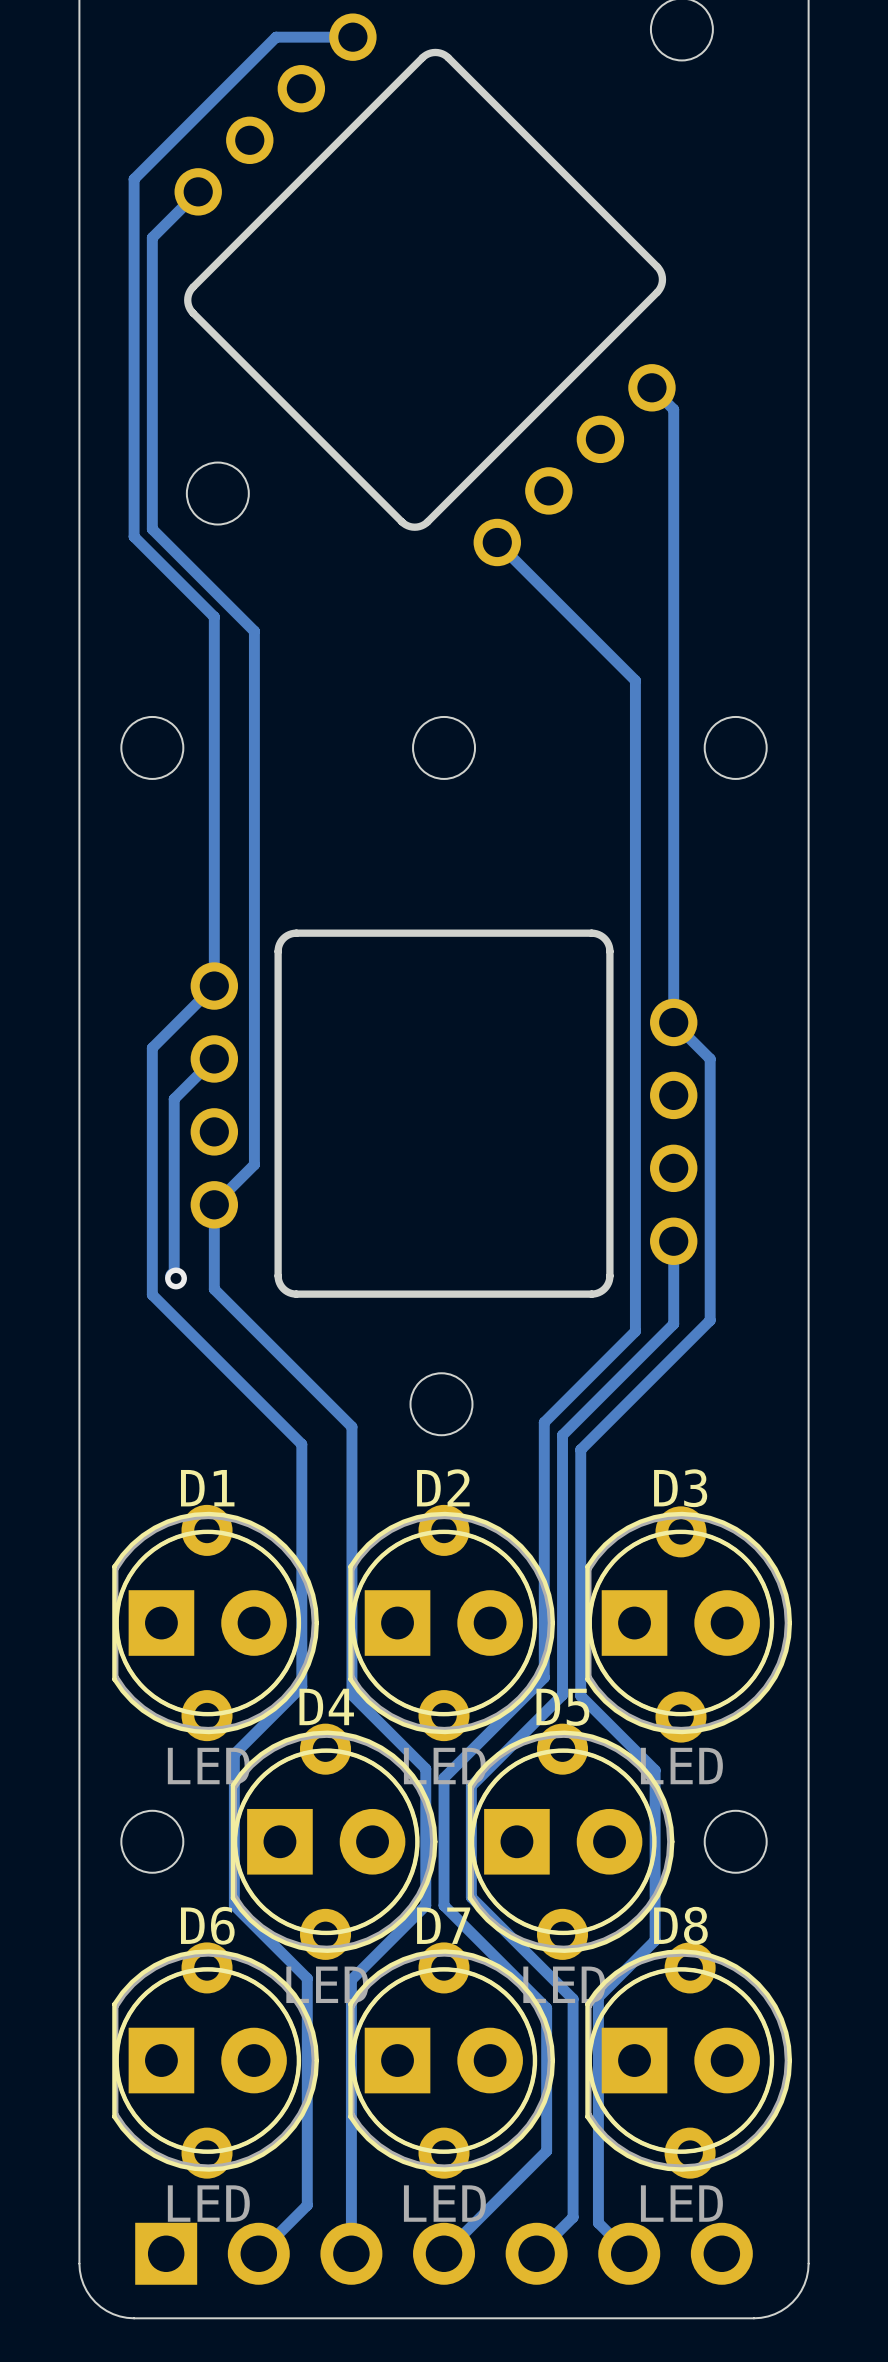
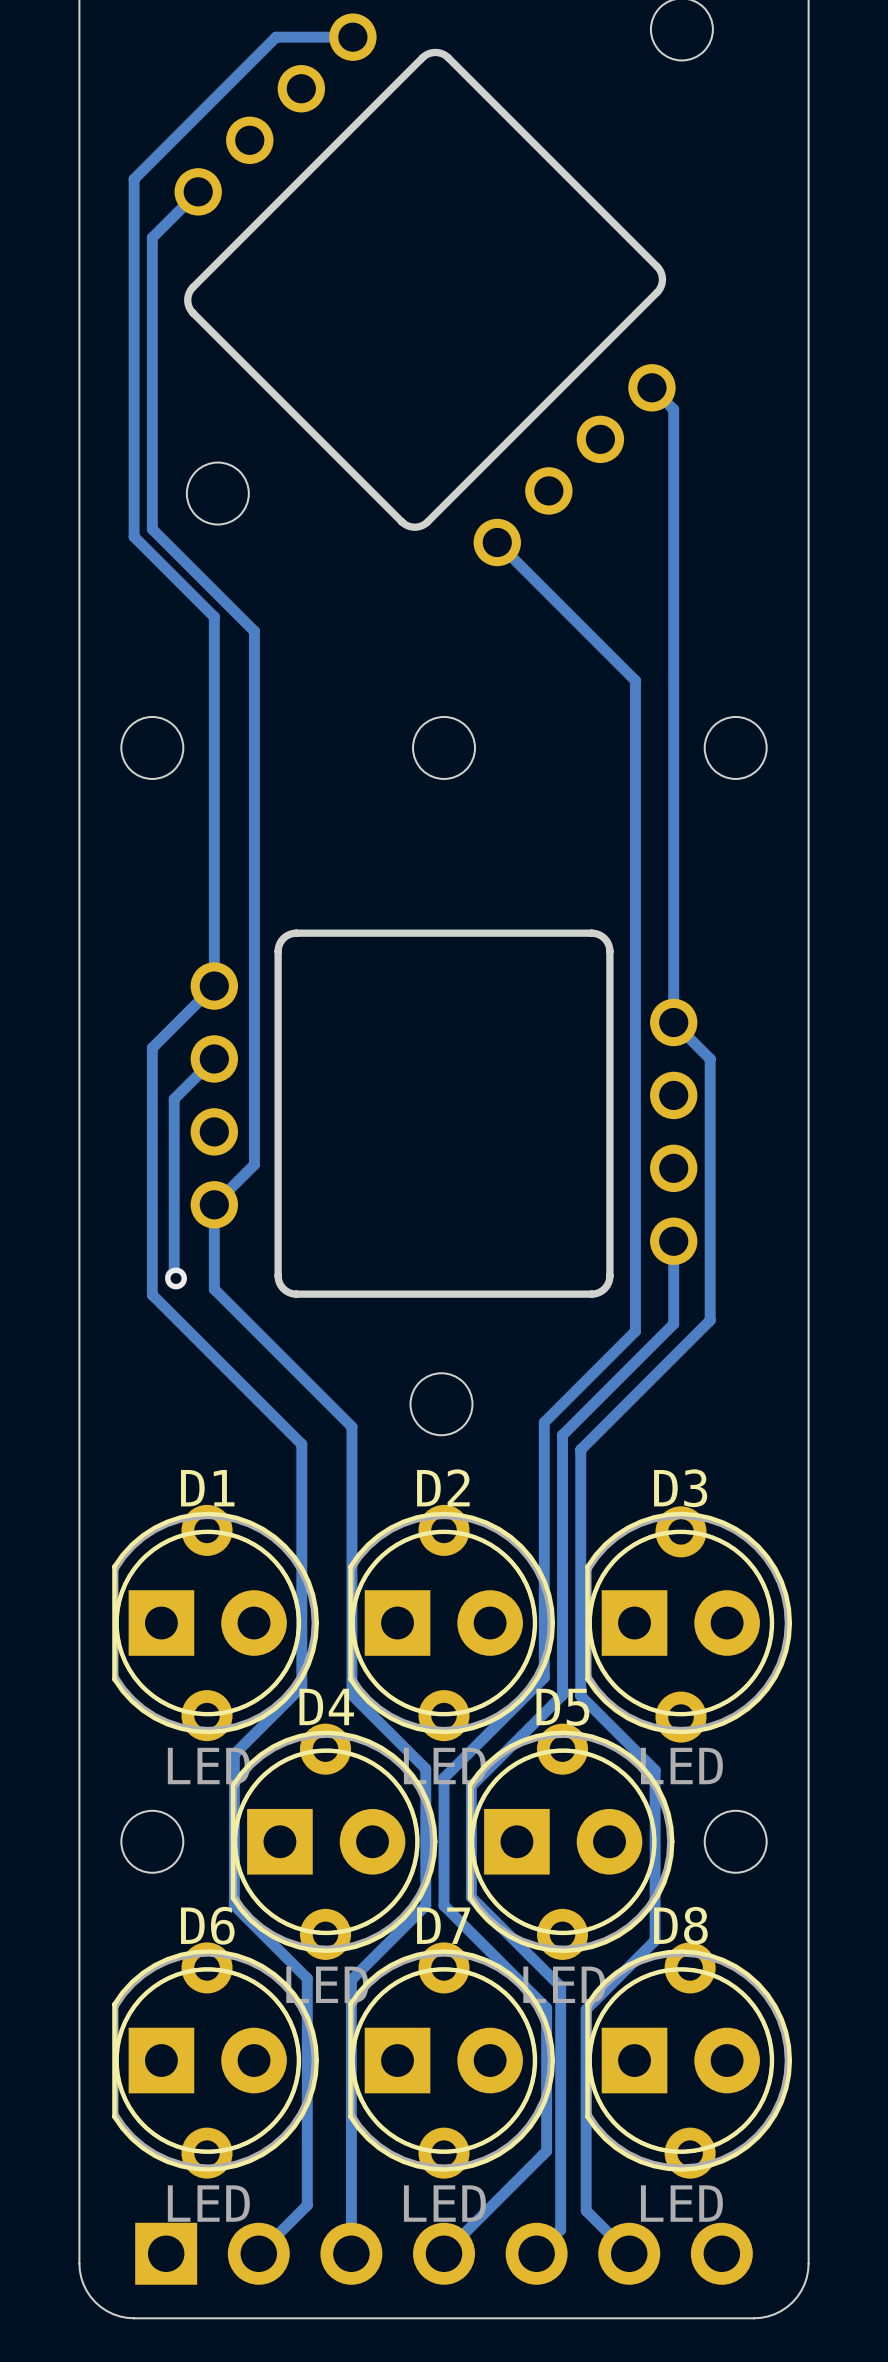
track: (560, 1986) (573, 1999) (573, 2217) (560, 2229) -> (560, 1986) (560, 2229)
track: (598, 1997) (598, 2222) -> (598, 1997) (586, 2009) (586, 2210) (598, 2222)

